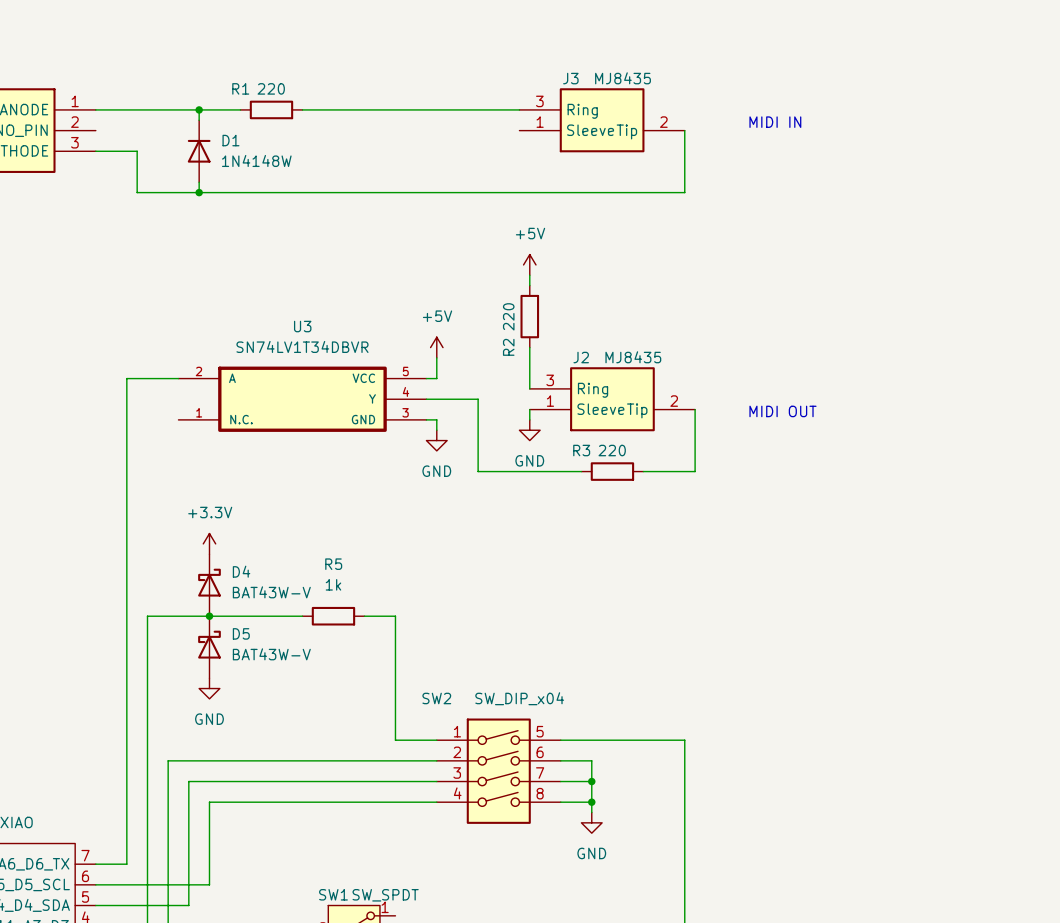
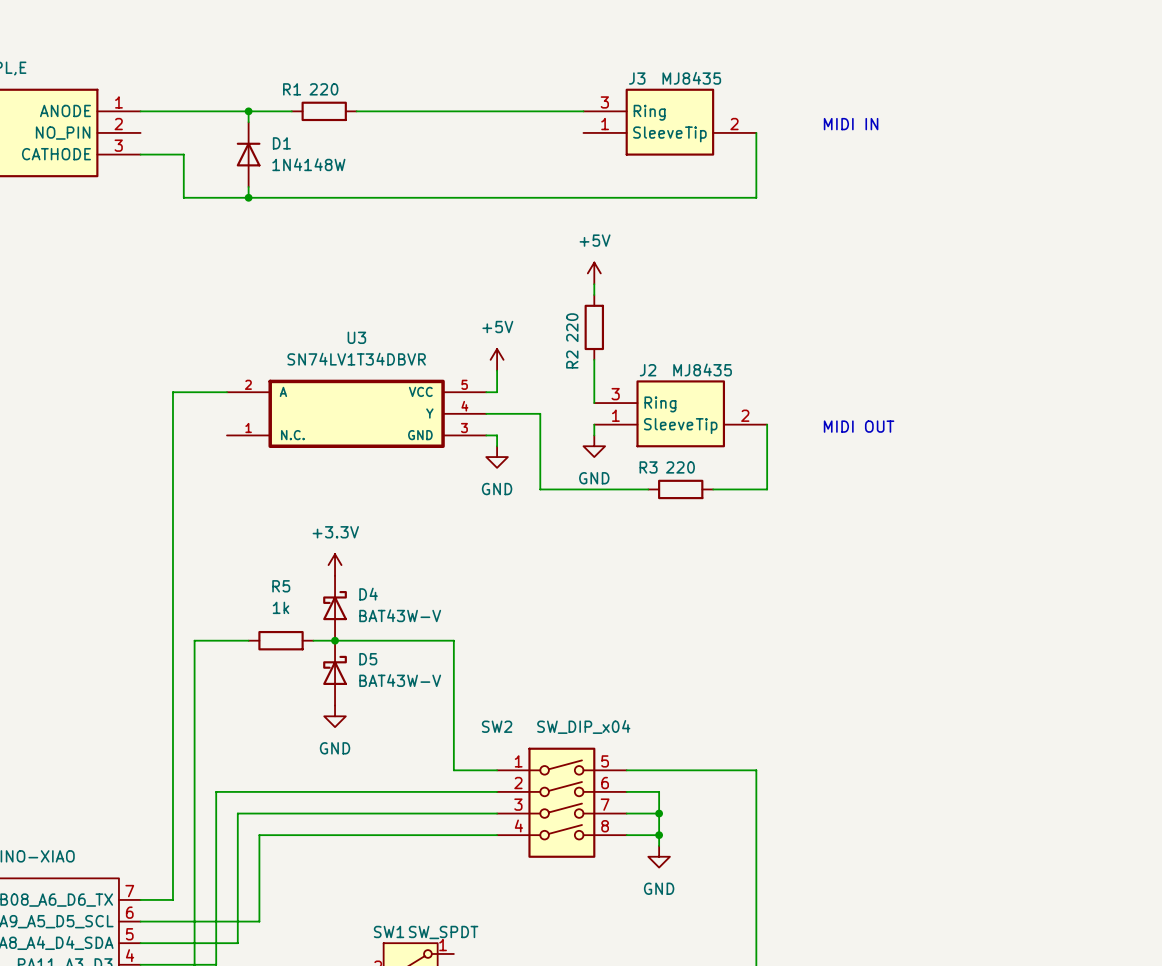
power symbol position: +3.3V (209, 543) -> +3.3V (335, 565)
D4 position: (209, 585) -> (335, 608)
wire: (199, 616) (261, 616) -> (356, 640) (421, 640)
junction: (209, 616) -> none
junction: none -> (335, 640)
R5 position: (333, 616) -> (281, 640)
D5 position: (209, 647) -> (335, 673)
power symbol position: GND (209, 688) -> GND (335, 716)

